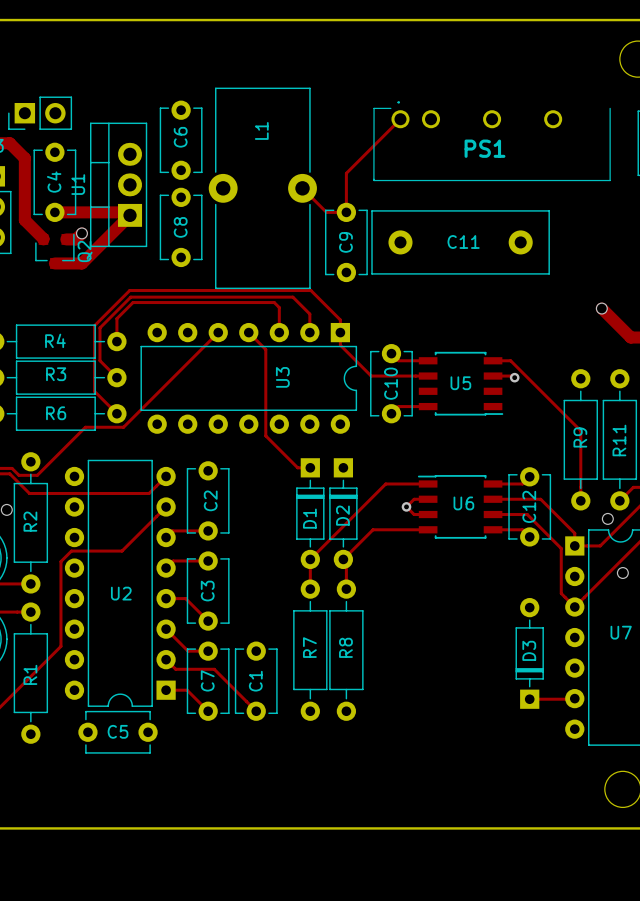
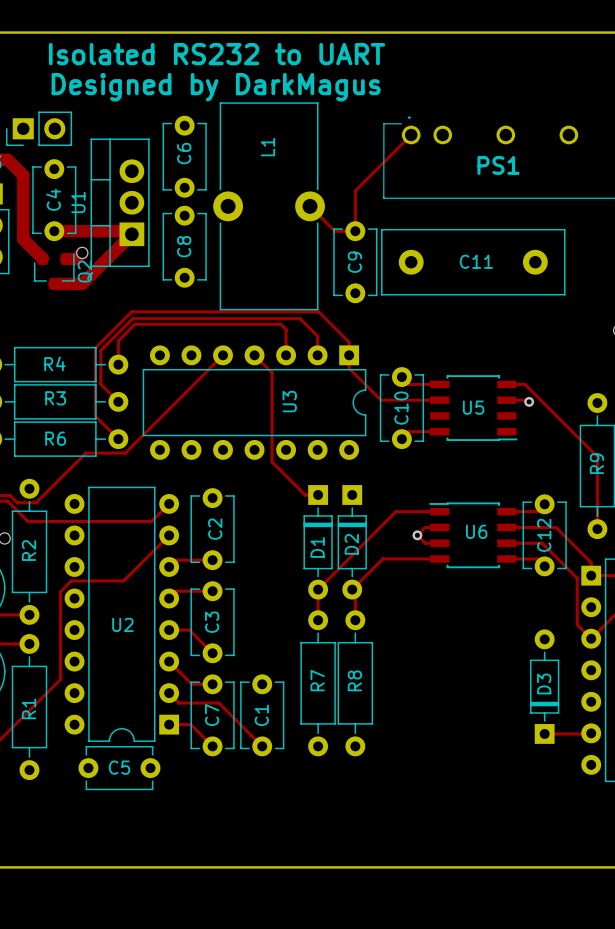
text: none -> Isolated RS232 to UART (217, 54)
text: none -> Designed by DarkMagus (216, 87)

